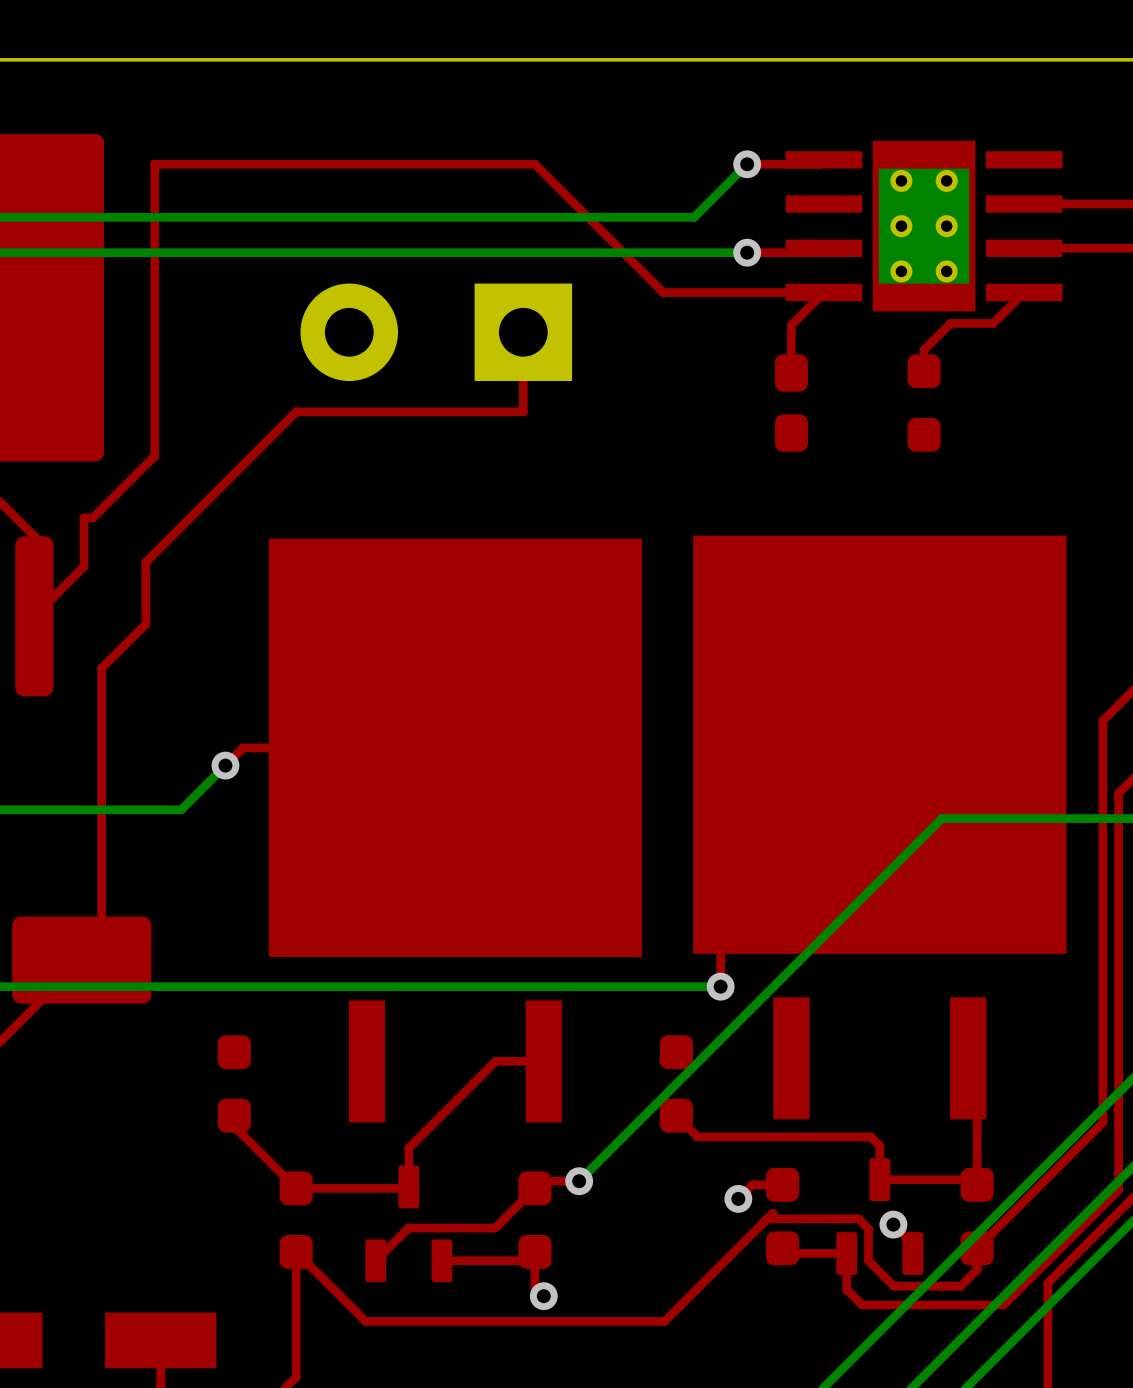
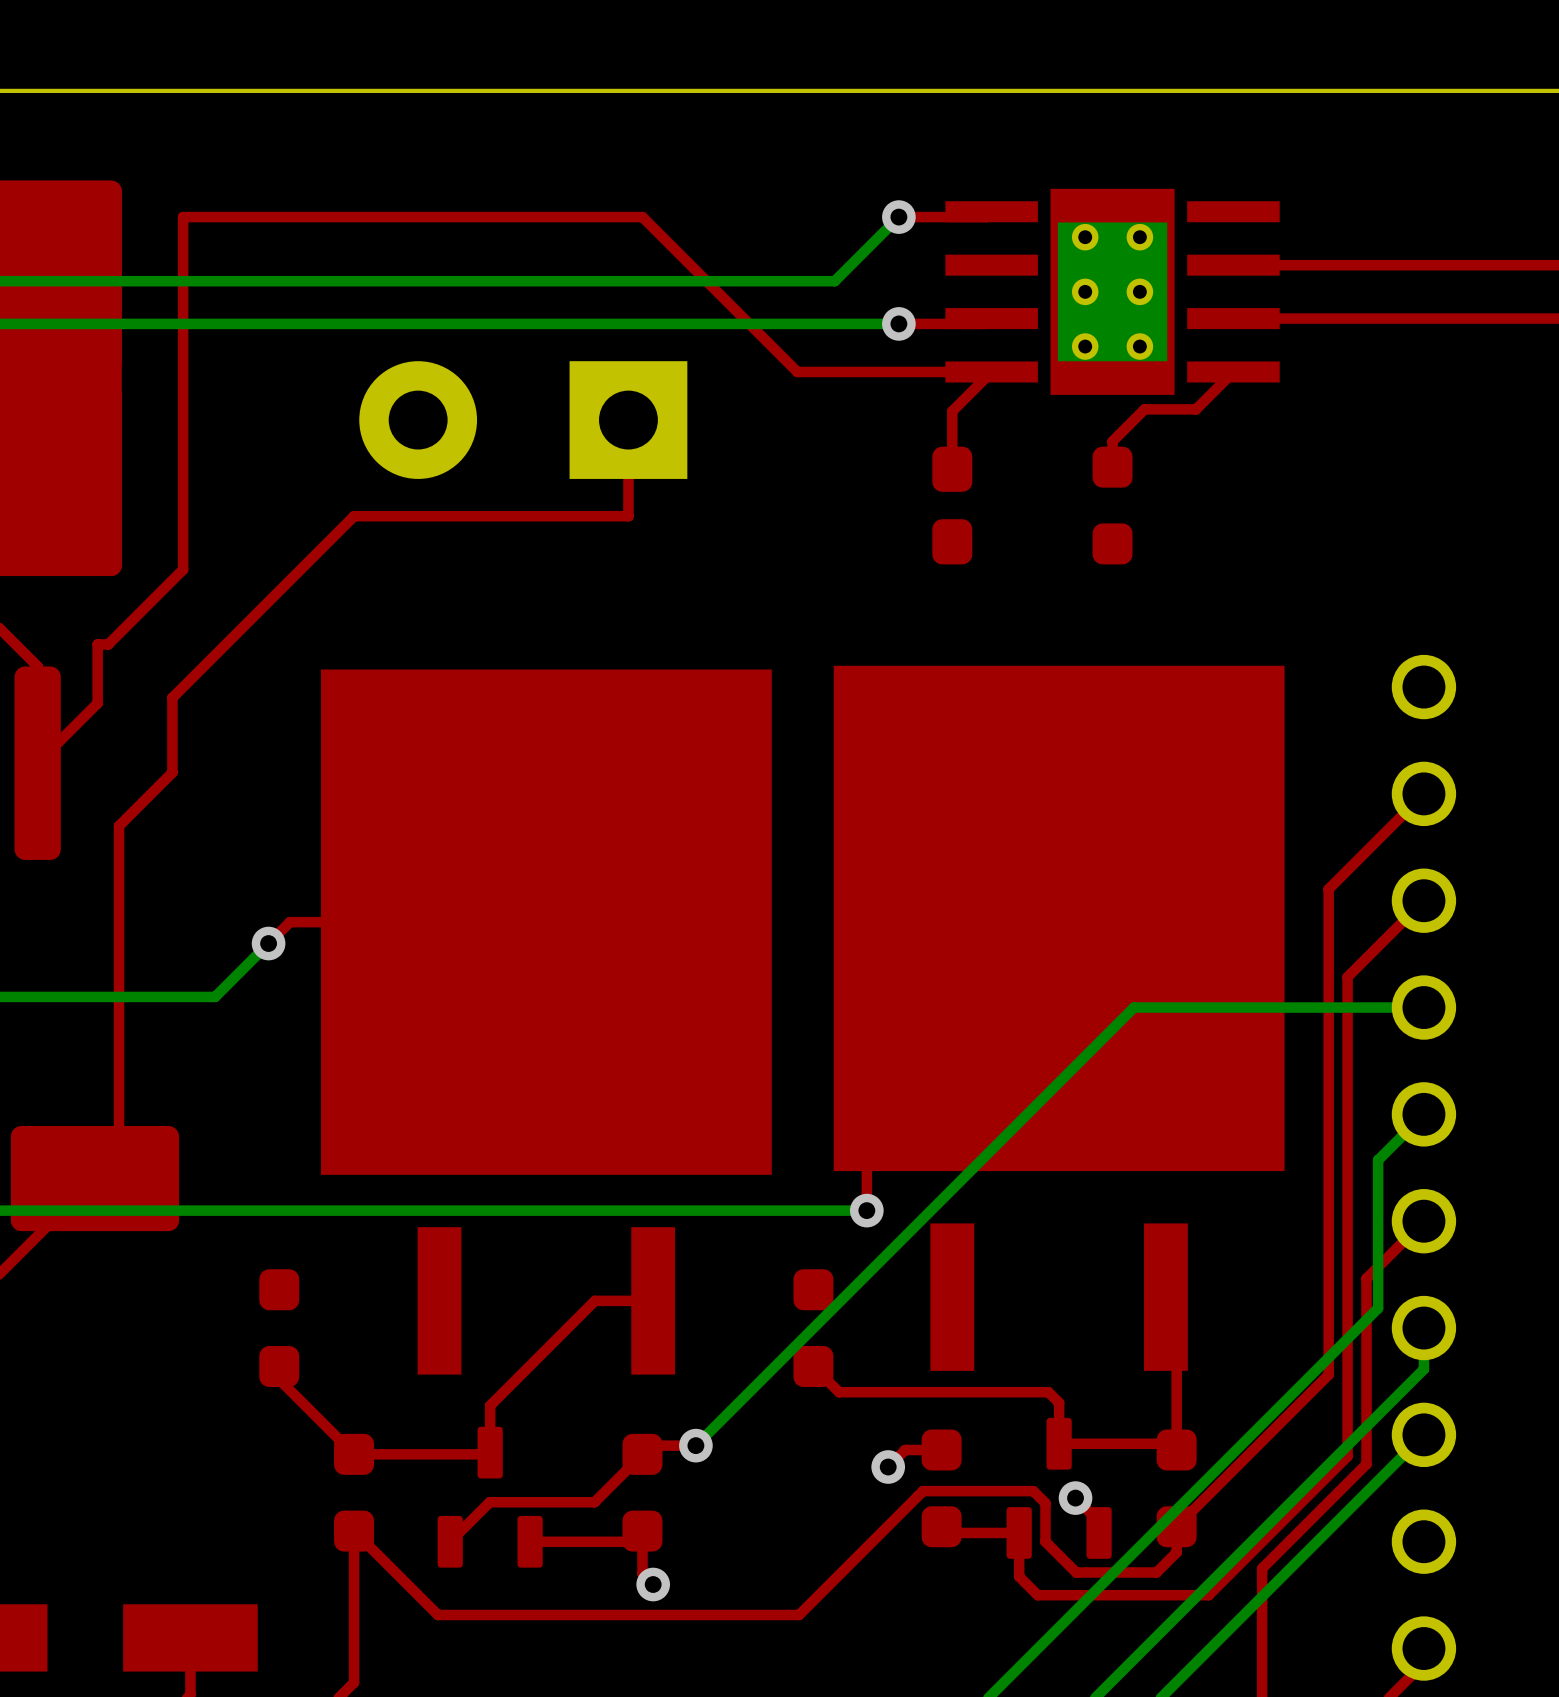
top track: (772, 1213) (767, 1218) -> none

